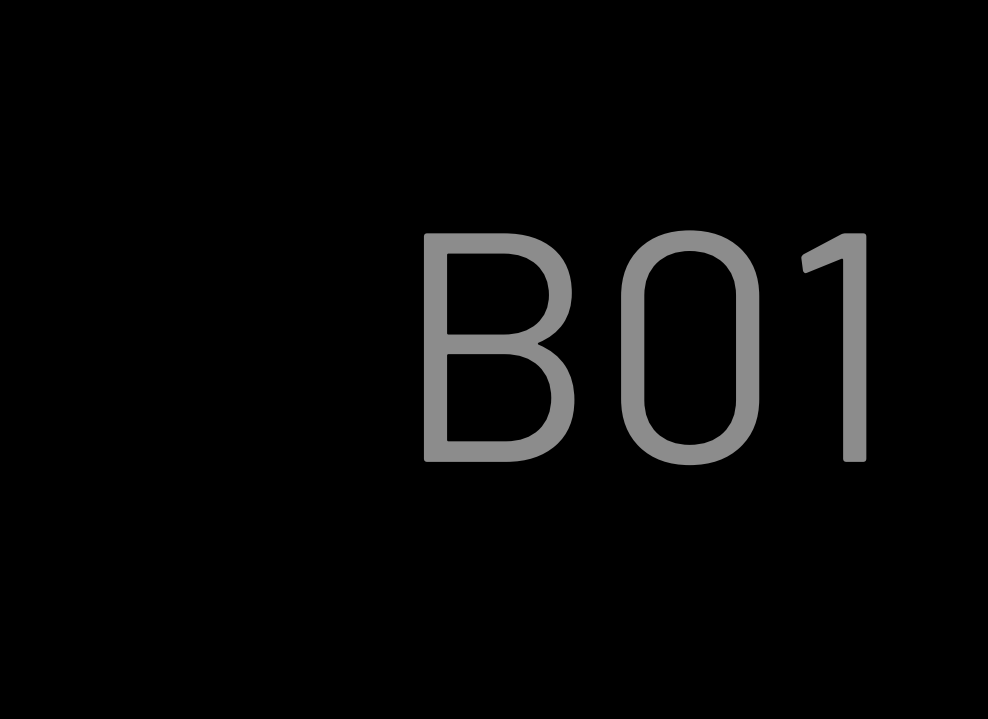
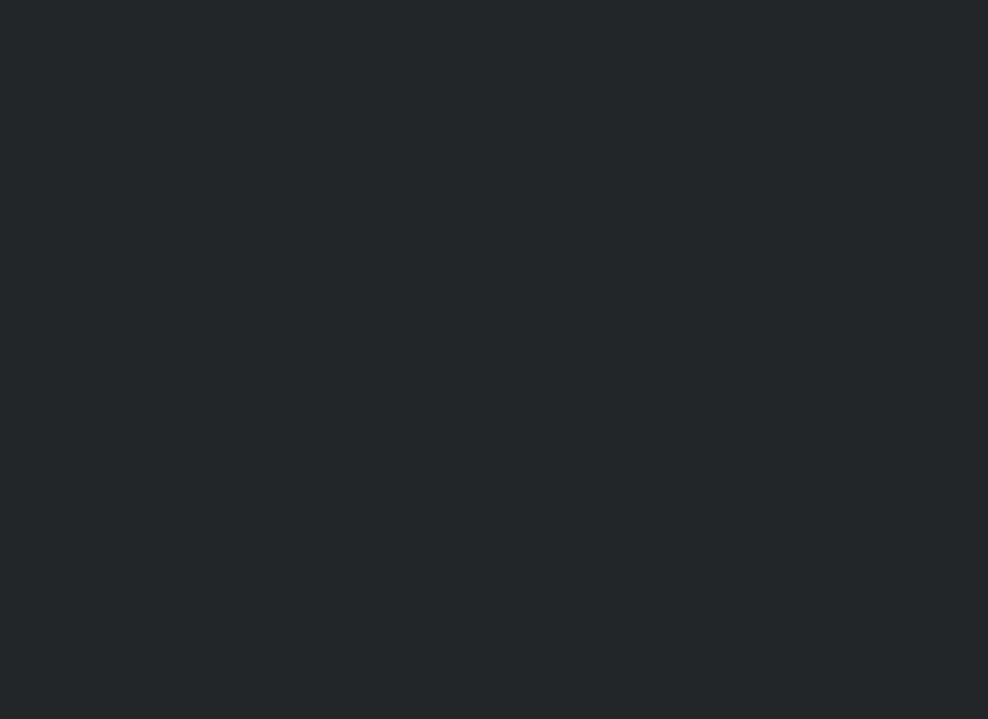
text: B01 (645, 347) -> none

